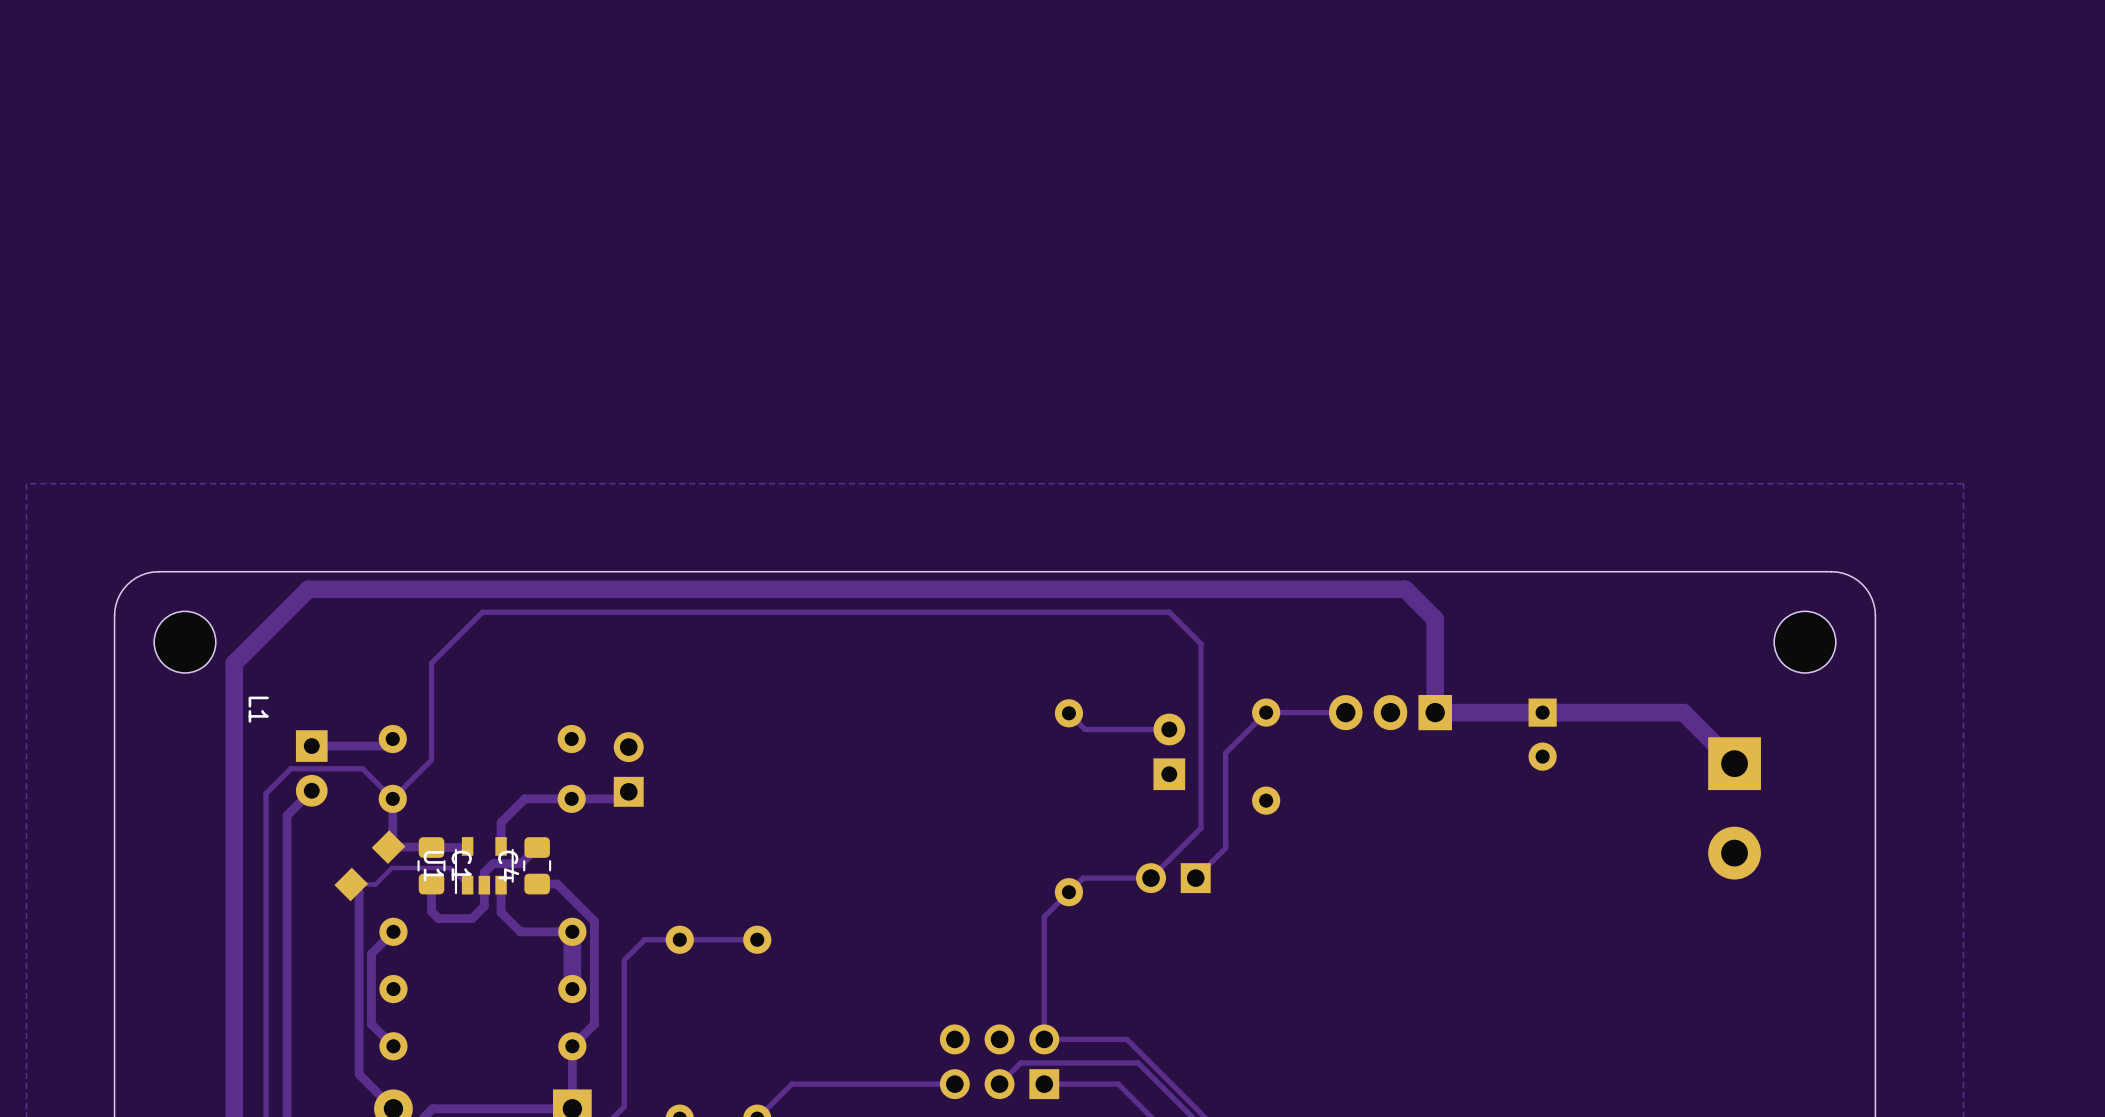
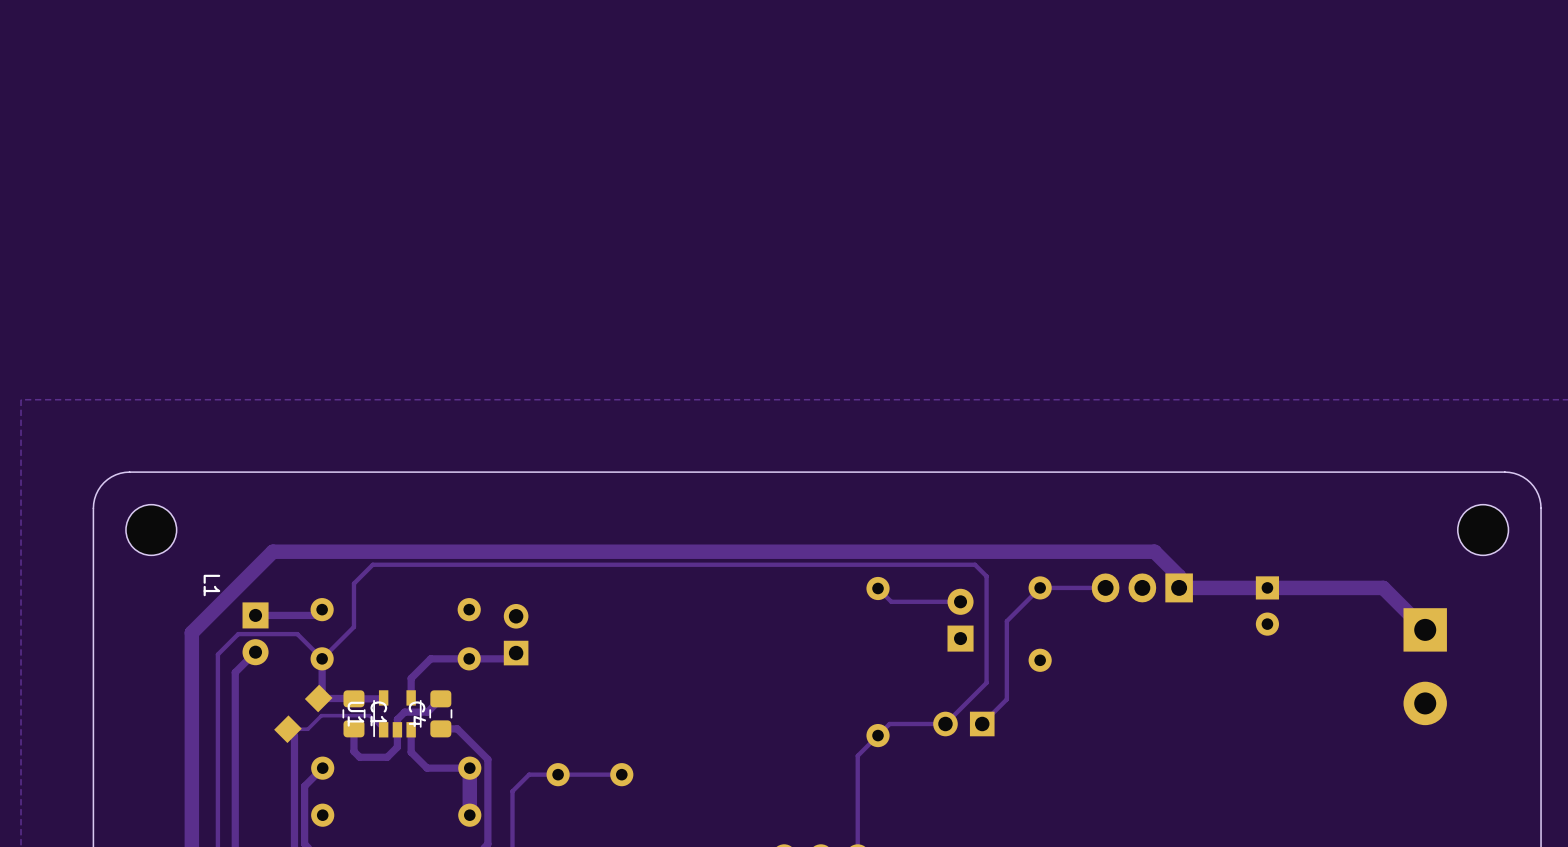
track: (1201, 698) (1201, 643) (1169, 612) (482, 612) (431, 663) (431, 707) -> (986, 576) (975, 564) (372, 564) (353, 583)
track: (1435, 698) (1435, 619) (1405, 589) (308, 589) (234, 663) (234, 767) -> (1179, 576) (1154, 551) (272, 551) (191, 632)

